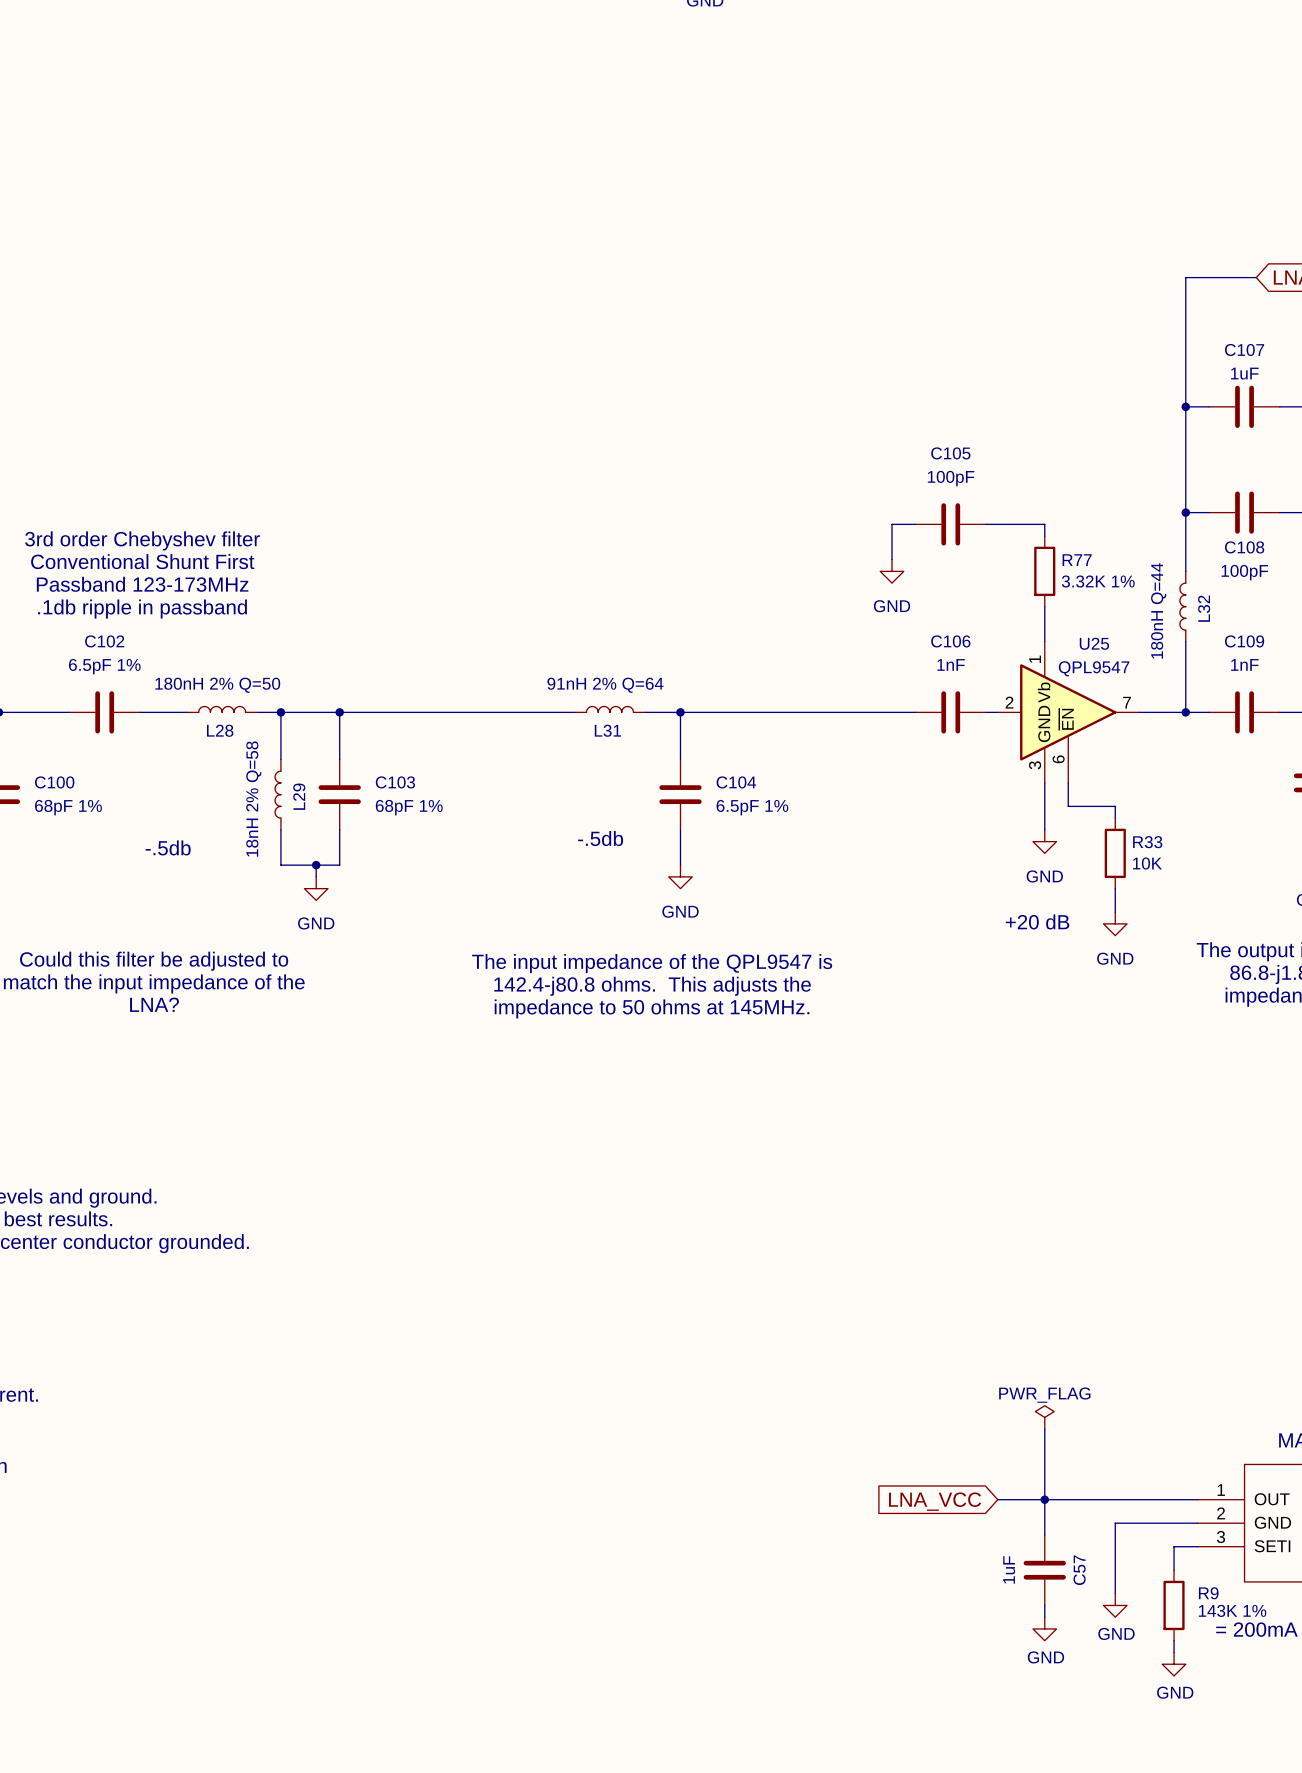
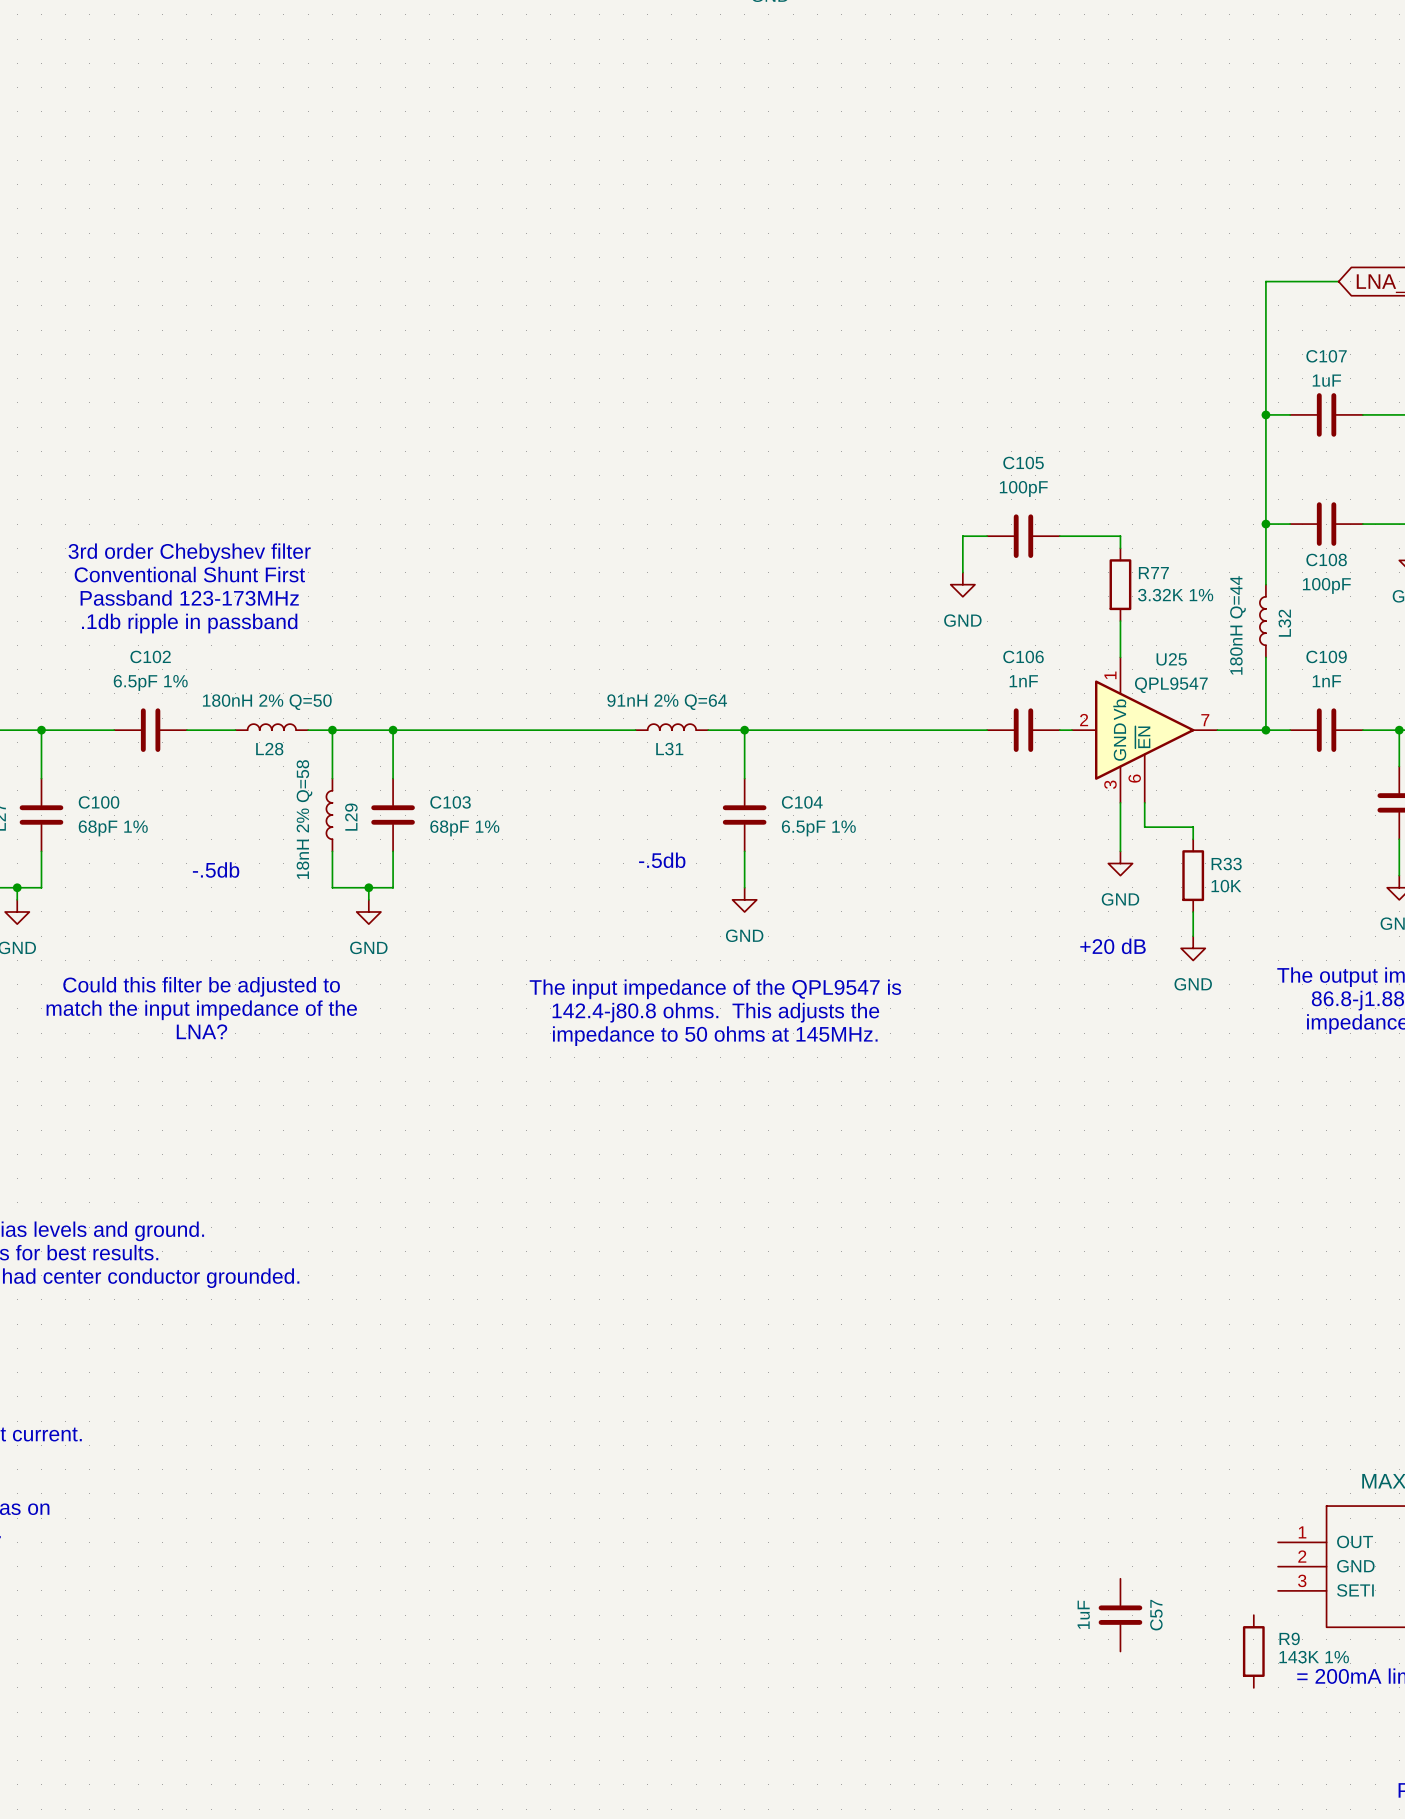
power symbol: PWR_FLAG (1044, 1417) -> none
wire: (1044, 1429) (1044, 1534) -> none
wire: (997, 1499) (1197, 1499) -> none
junction: (1044, 1499) -> none
global label: LNA_VCC (935, 1501) -> none
wire: (1197, 1523) (1115, 1523) (1115, 1593) -> none
wire: (1197, 1546) (1174, 1546) (1174, 1570) -> none
wire: (1044, 1605) (1044, 1617) -> none
power symbol: GND (1115, 1605) -> none
power symbol: GND (1044, 1628) -> none
wire: (1174, 1640) (1174, 1652) -> none
power symbol: GND (1174, 1664) -> none

